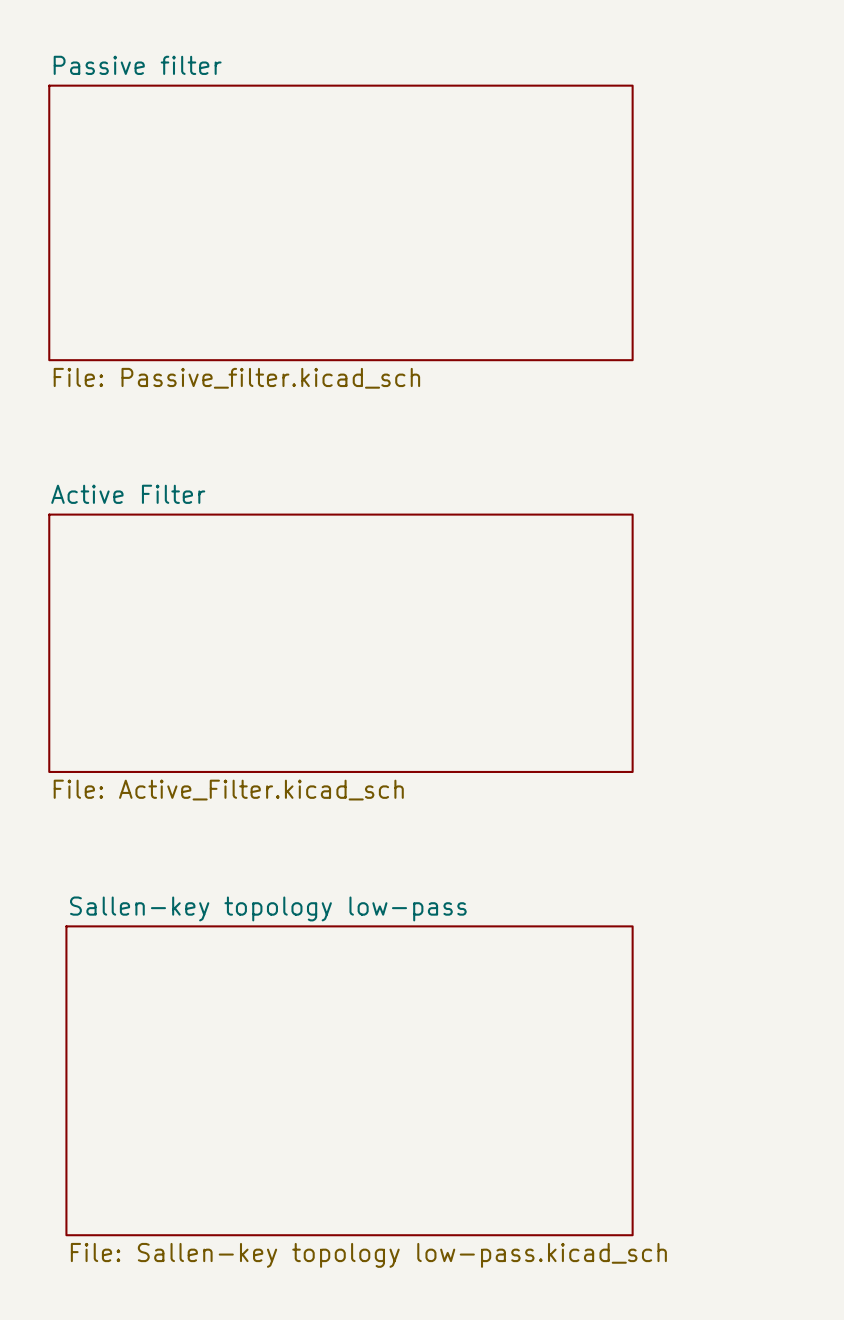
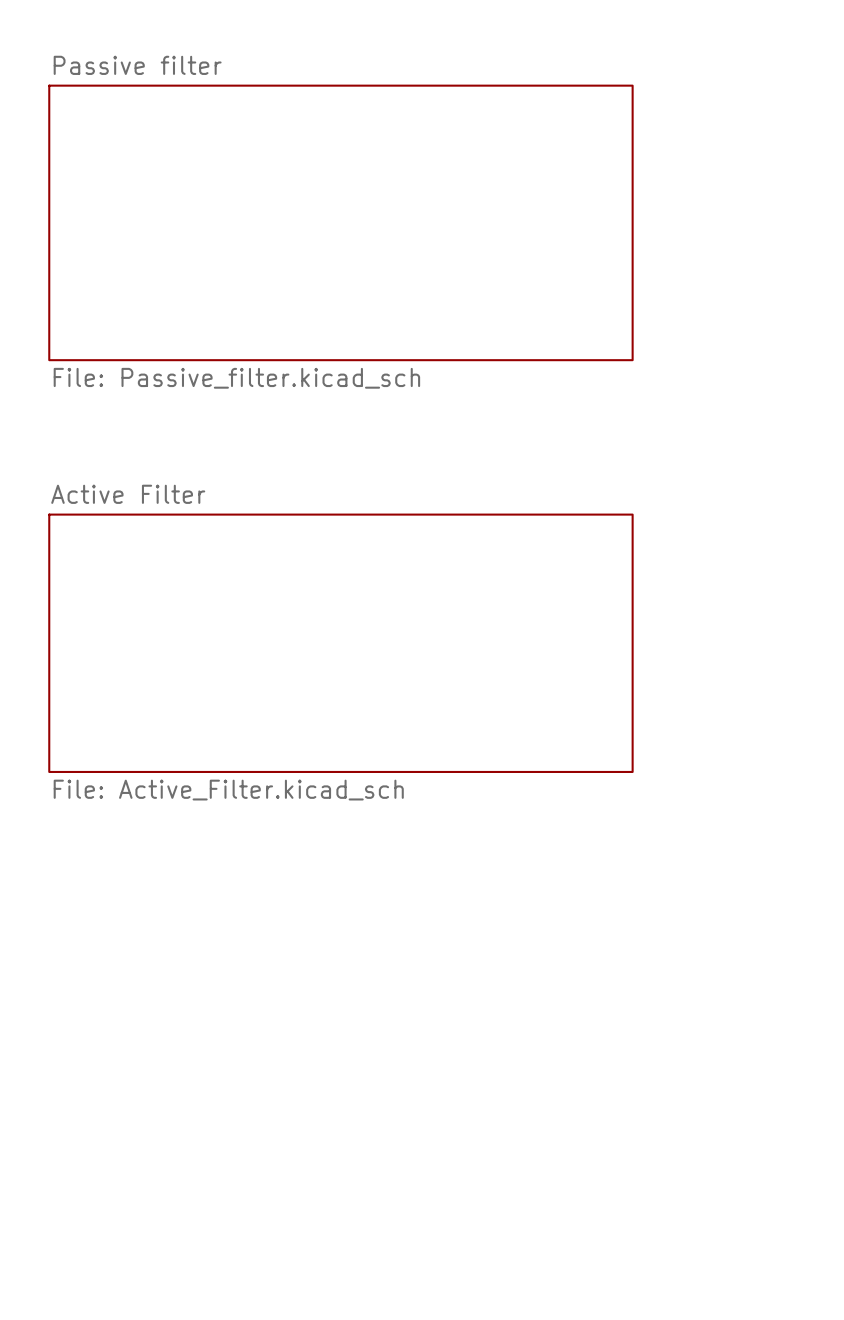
sheet Sallen-key topology low-pass: File: Sallen-key topology low-pass.kicad_sch (349, 1080) -> none

